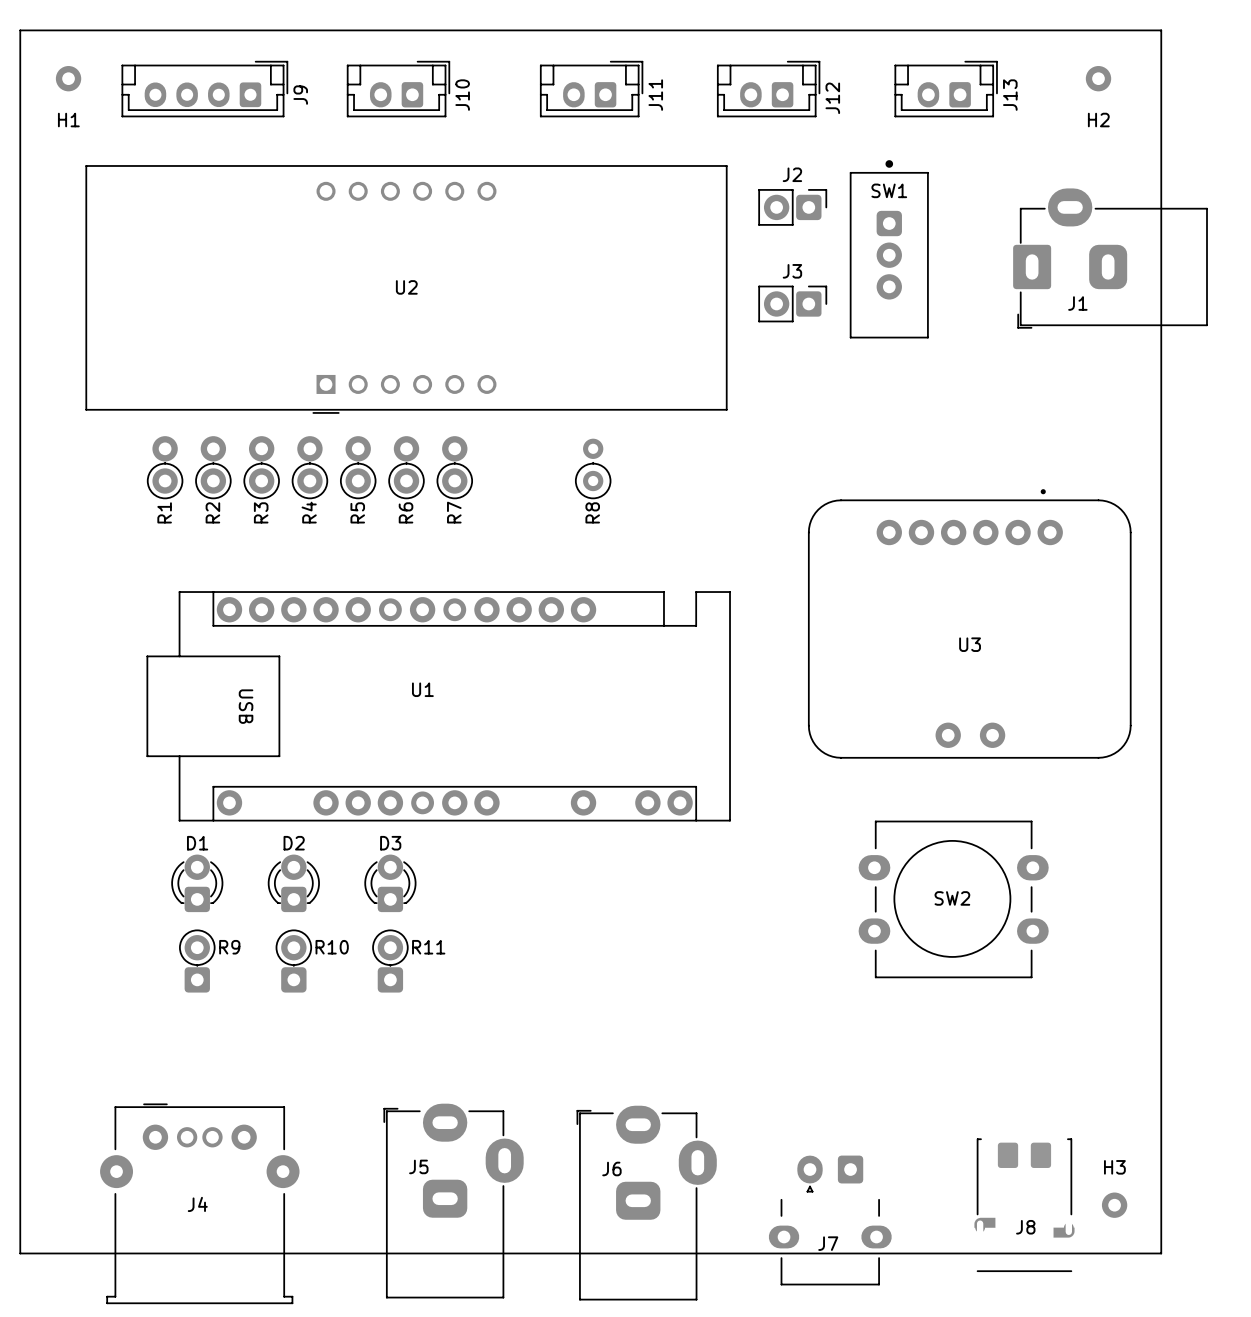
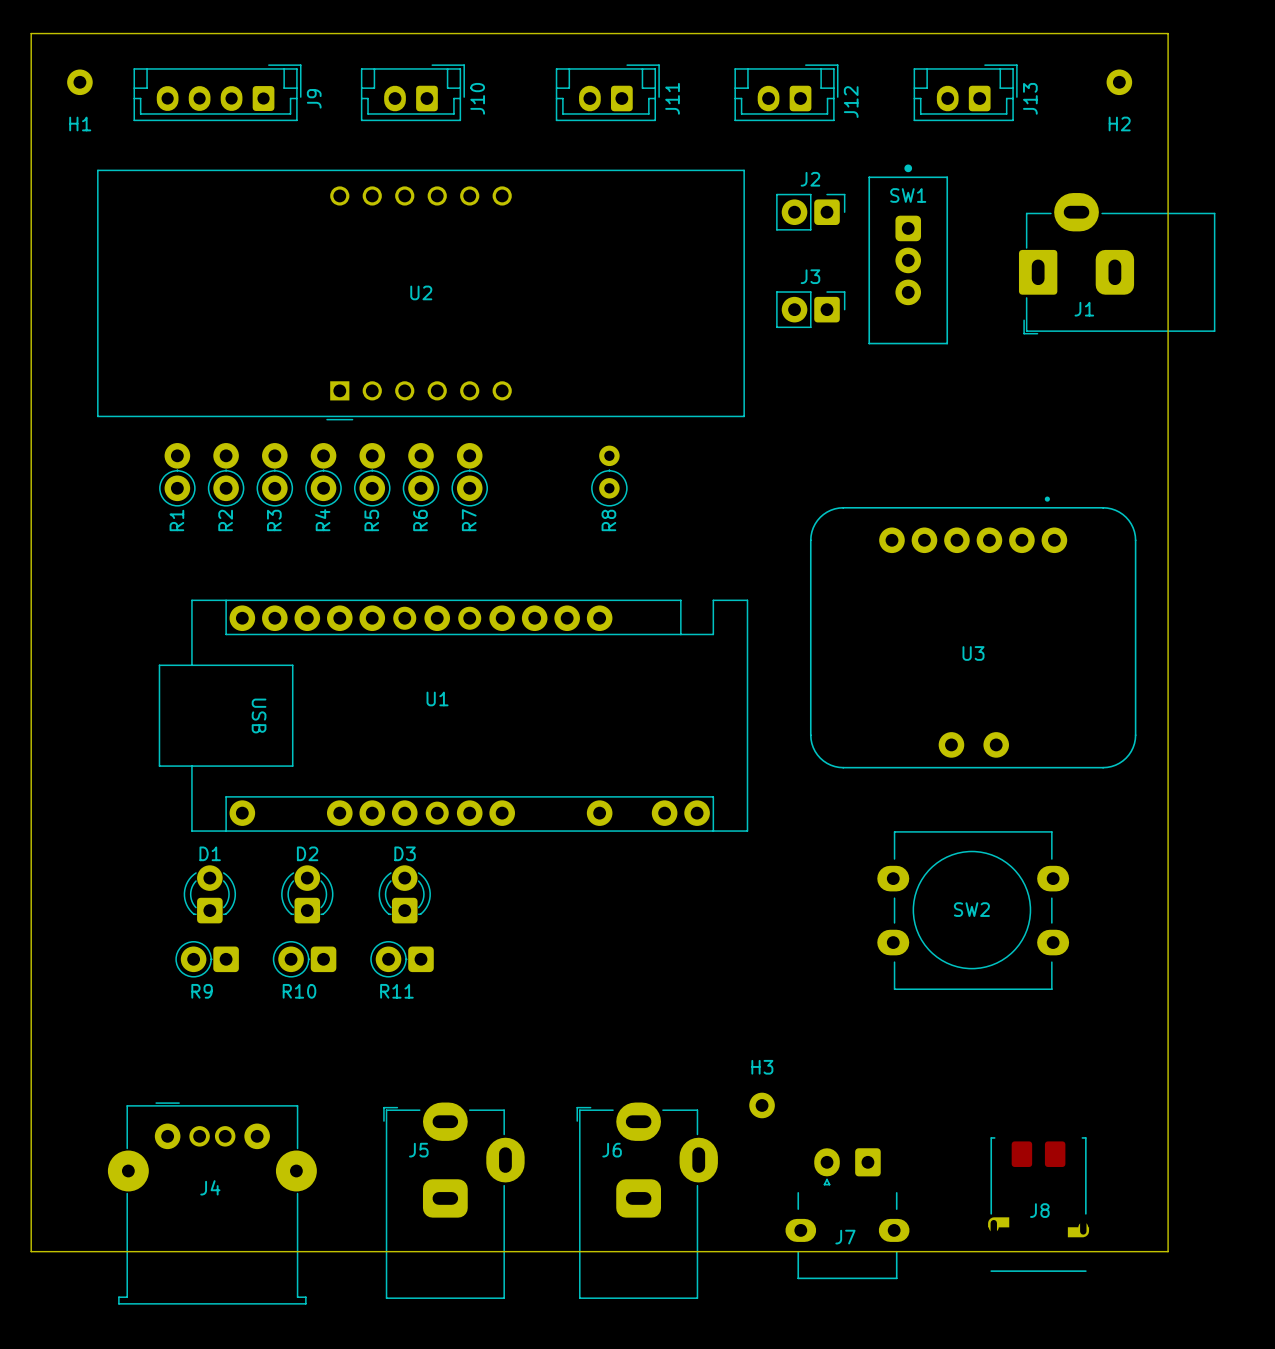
board edge: (1146, 30) (1161, 30) (1161, 1253) (20, 1253) (20, 1237) -> (1168, 33) (1168, 1251) (31, 1251)
J1 position: (1110, 258) -> (1117, 263)
U3 position: (969, 623) -> (973, 632)
R9 name position: R9 (229, 947) -> R9 (202, 991)
R10 name position: R10 (332, 947) -> R10 (299, 991)
R11 name position: R11 (428, 947) -> R11 (396, 991)
R9 rotation: 0° (197, 961) -> 90° counterclockwise (207, 959)
R10 rotation: 0° (293, 961) -> 90° counterclockwise (304, 959)
R11 rotation: 0° (390, 961) -> 90° counterclockwise (402, 959)
J4 footprint: [100, 1103, 300, 1305] -> [107, 1102, 317, 1305]
J5 name position: J5 (418, 1166) -> J5 (418, 1150)
J6 name position: J6 (611, 1168) -> J6 (612, 1150)
J5 position: (453, 1200) -> (453, 1200)
J6 position: (646, 1203) -> (647, 1200)
J8 position: (1024, 1205) -> (1038, 1204)
H3 position: (1114, 1205) -> (762, 1105)
J7 position: (830, 1220) -> (847, 1213)
J8 name position: J8 (1025, 1227) -> J8 (1039, 1210)

